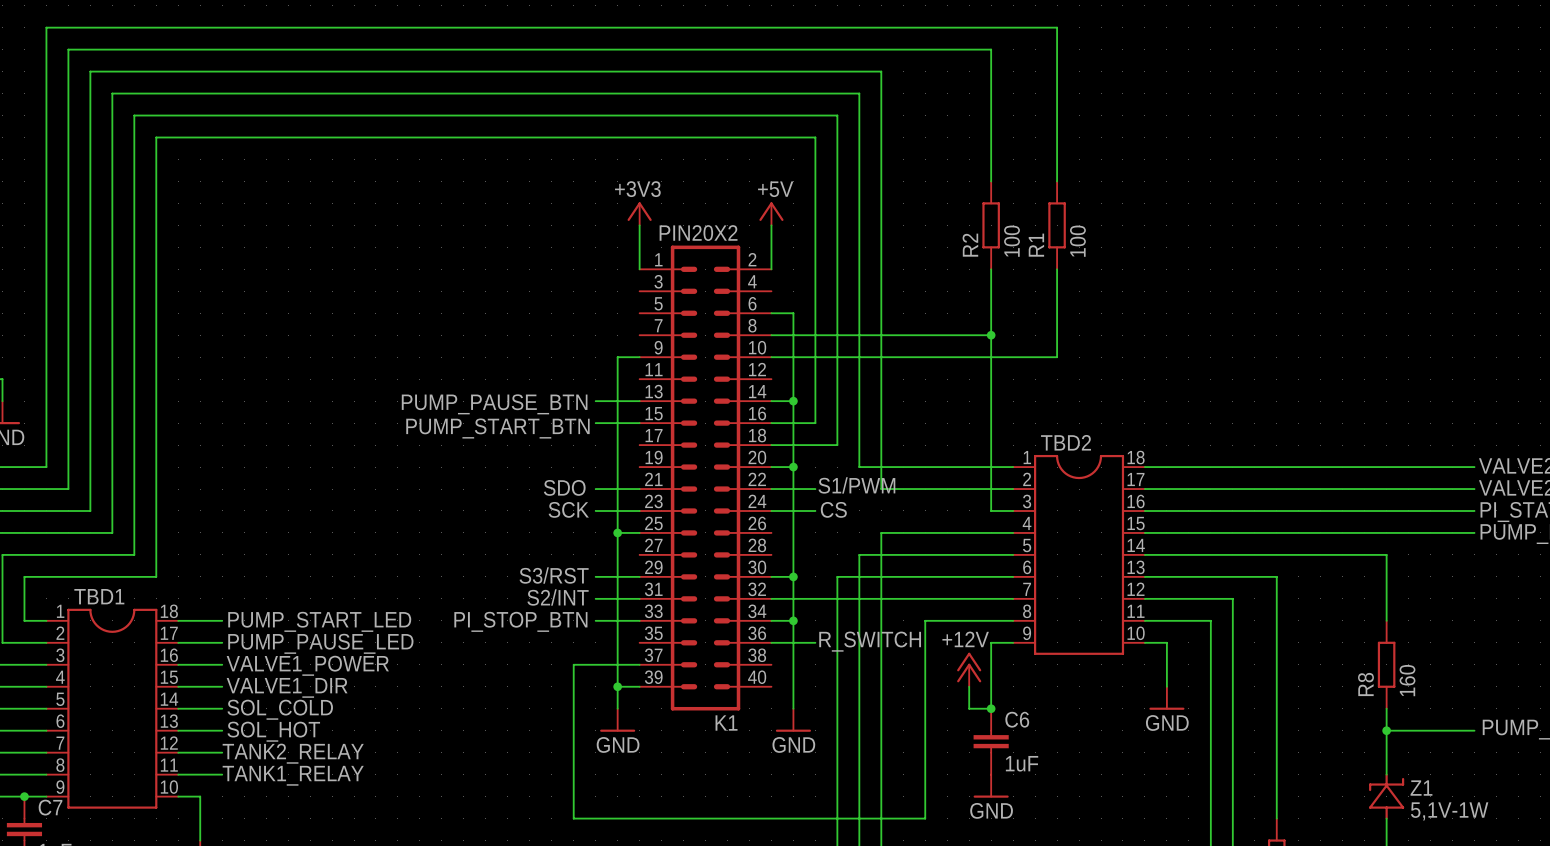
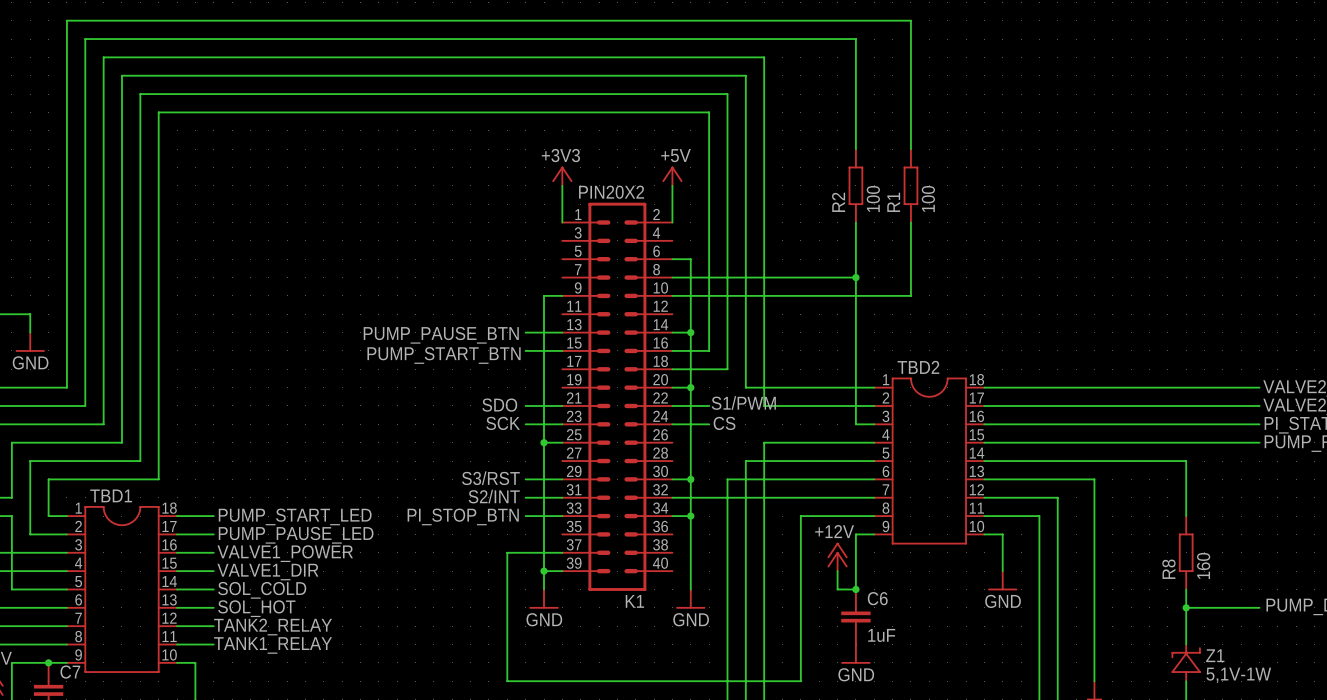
label: R_SWITCH (870, 641) -> none
wire: (771, 642) (815, 642) -> none

